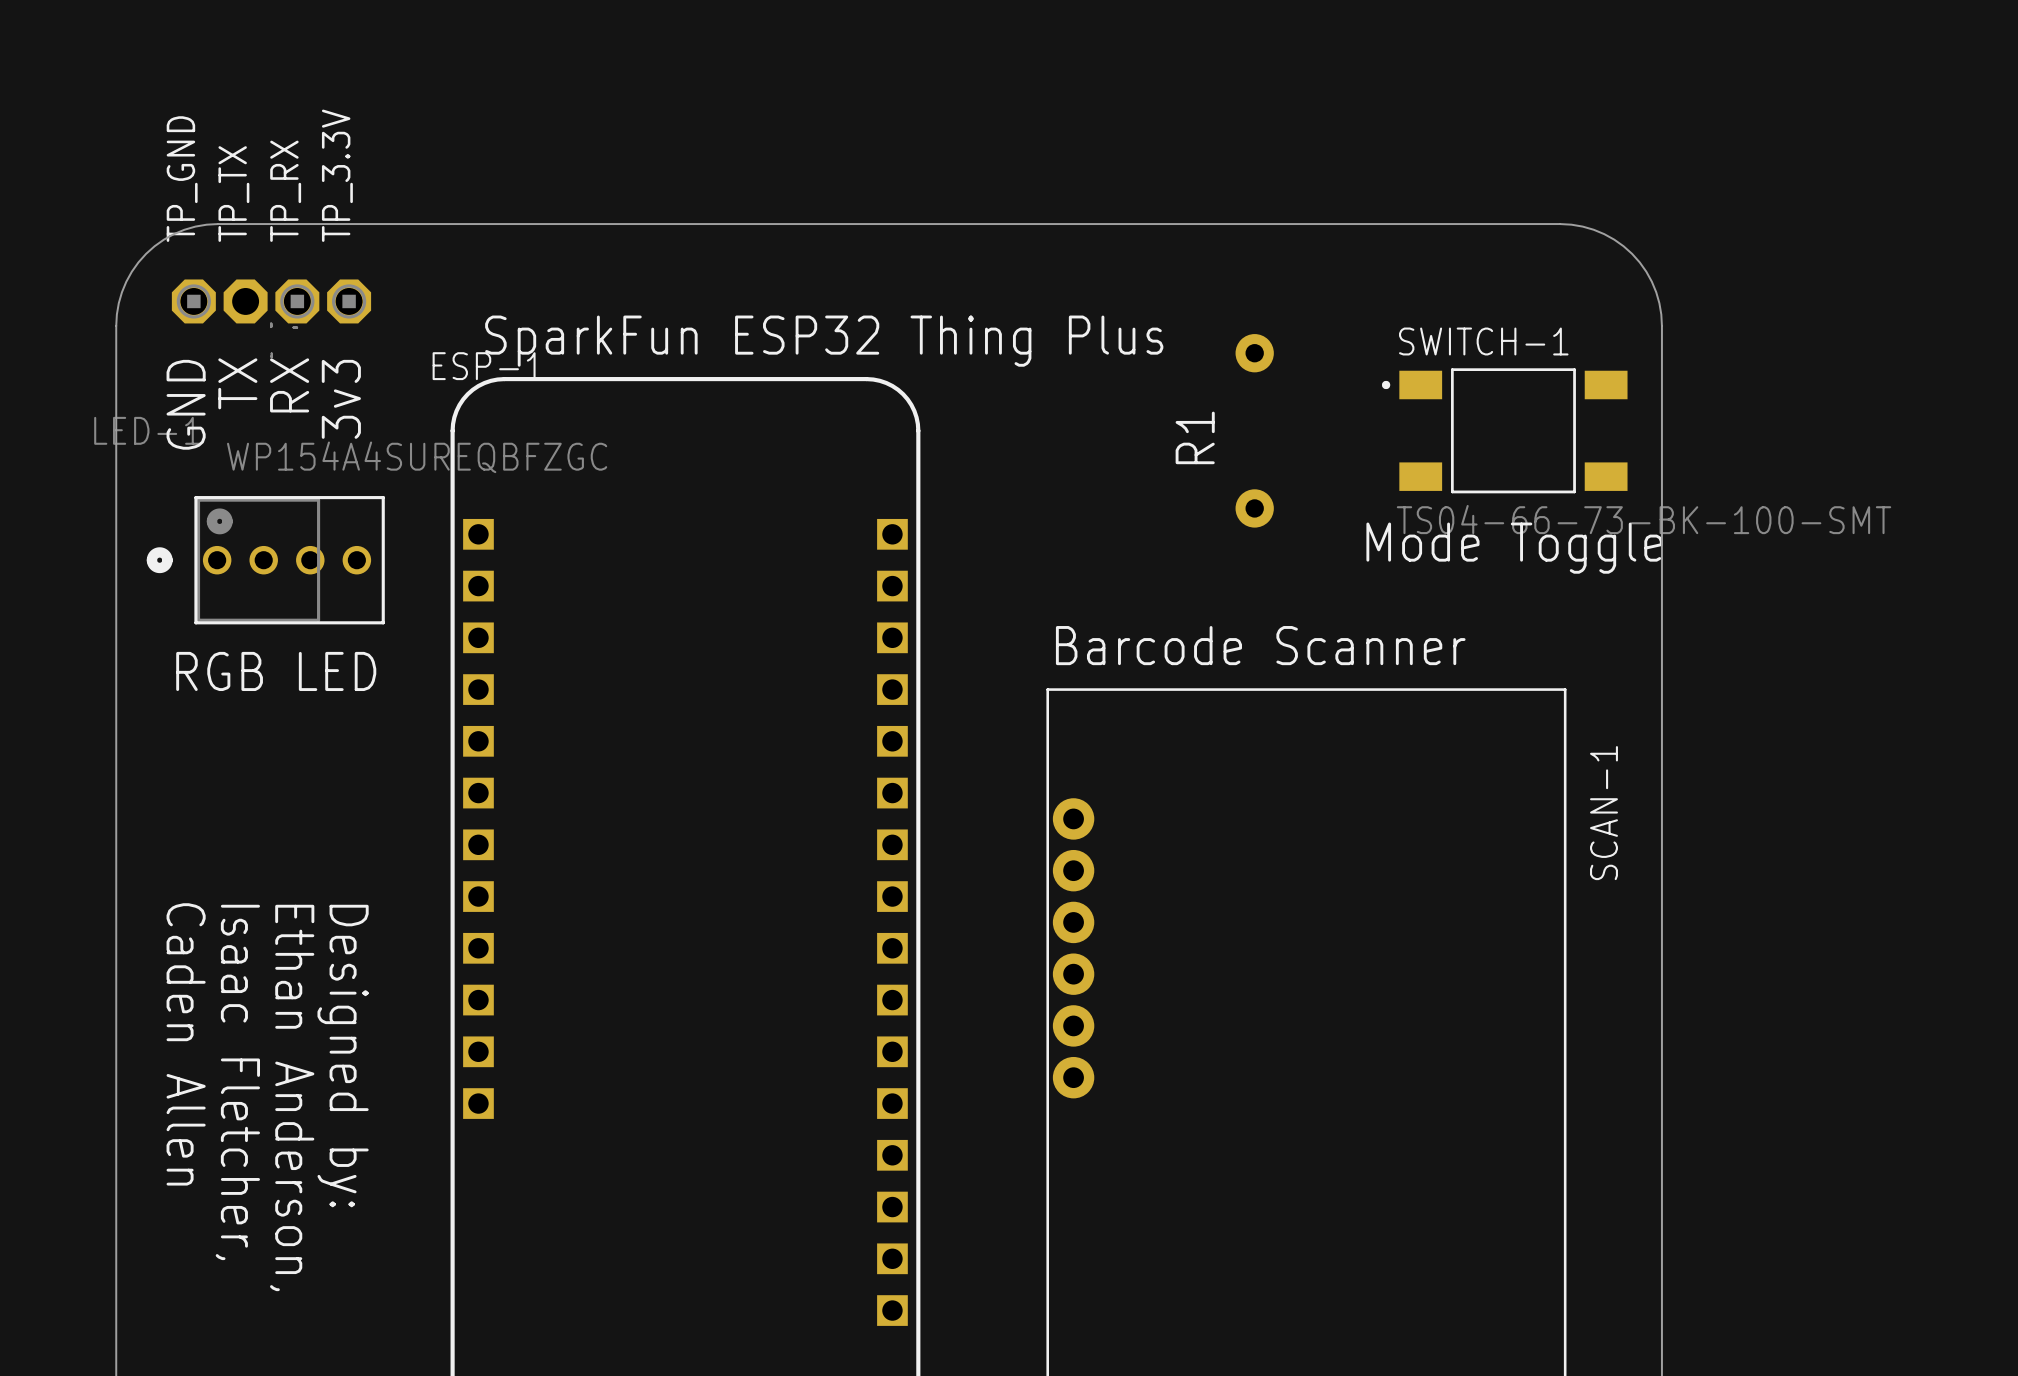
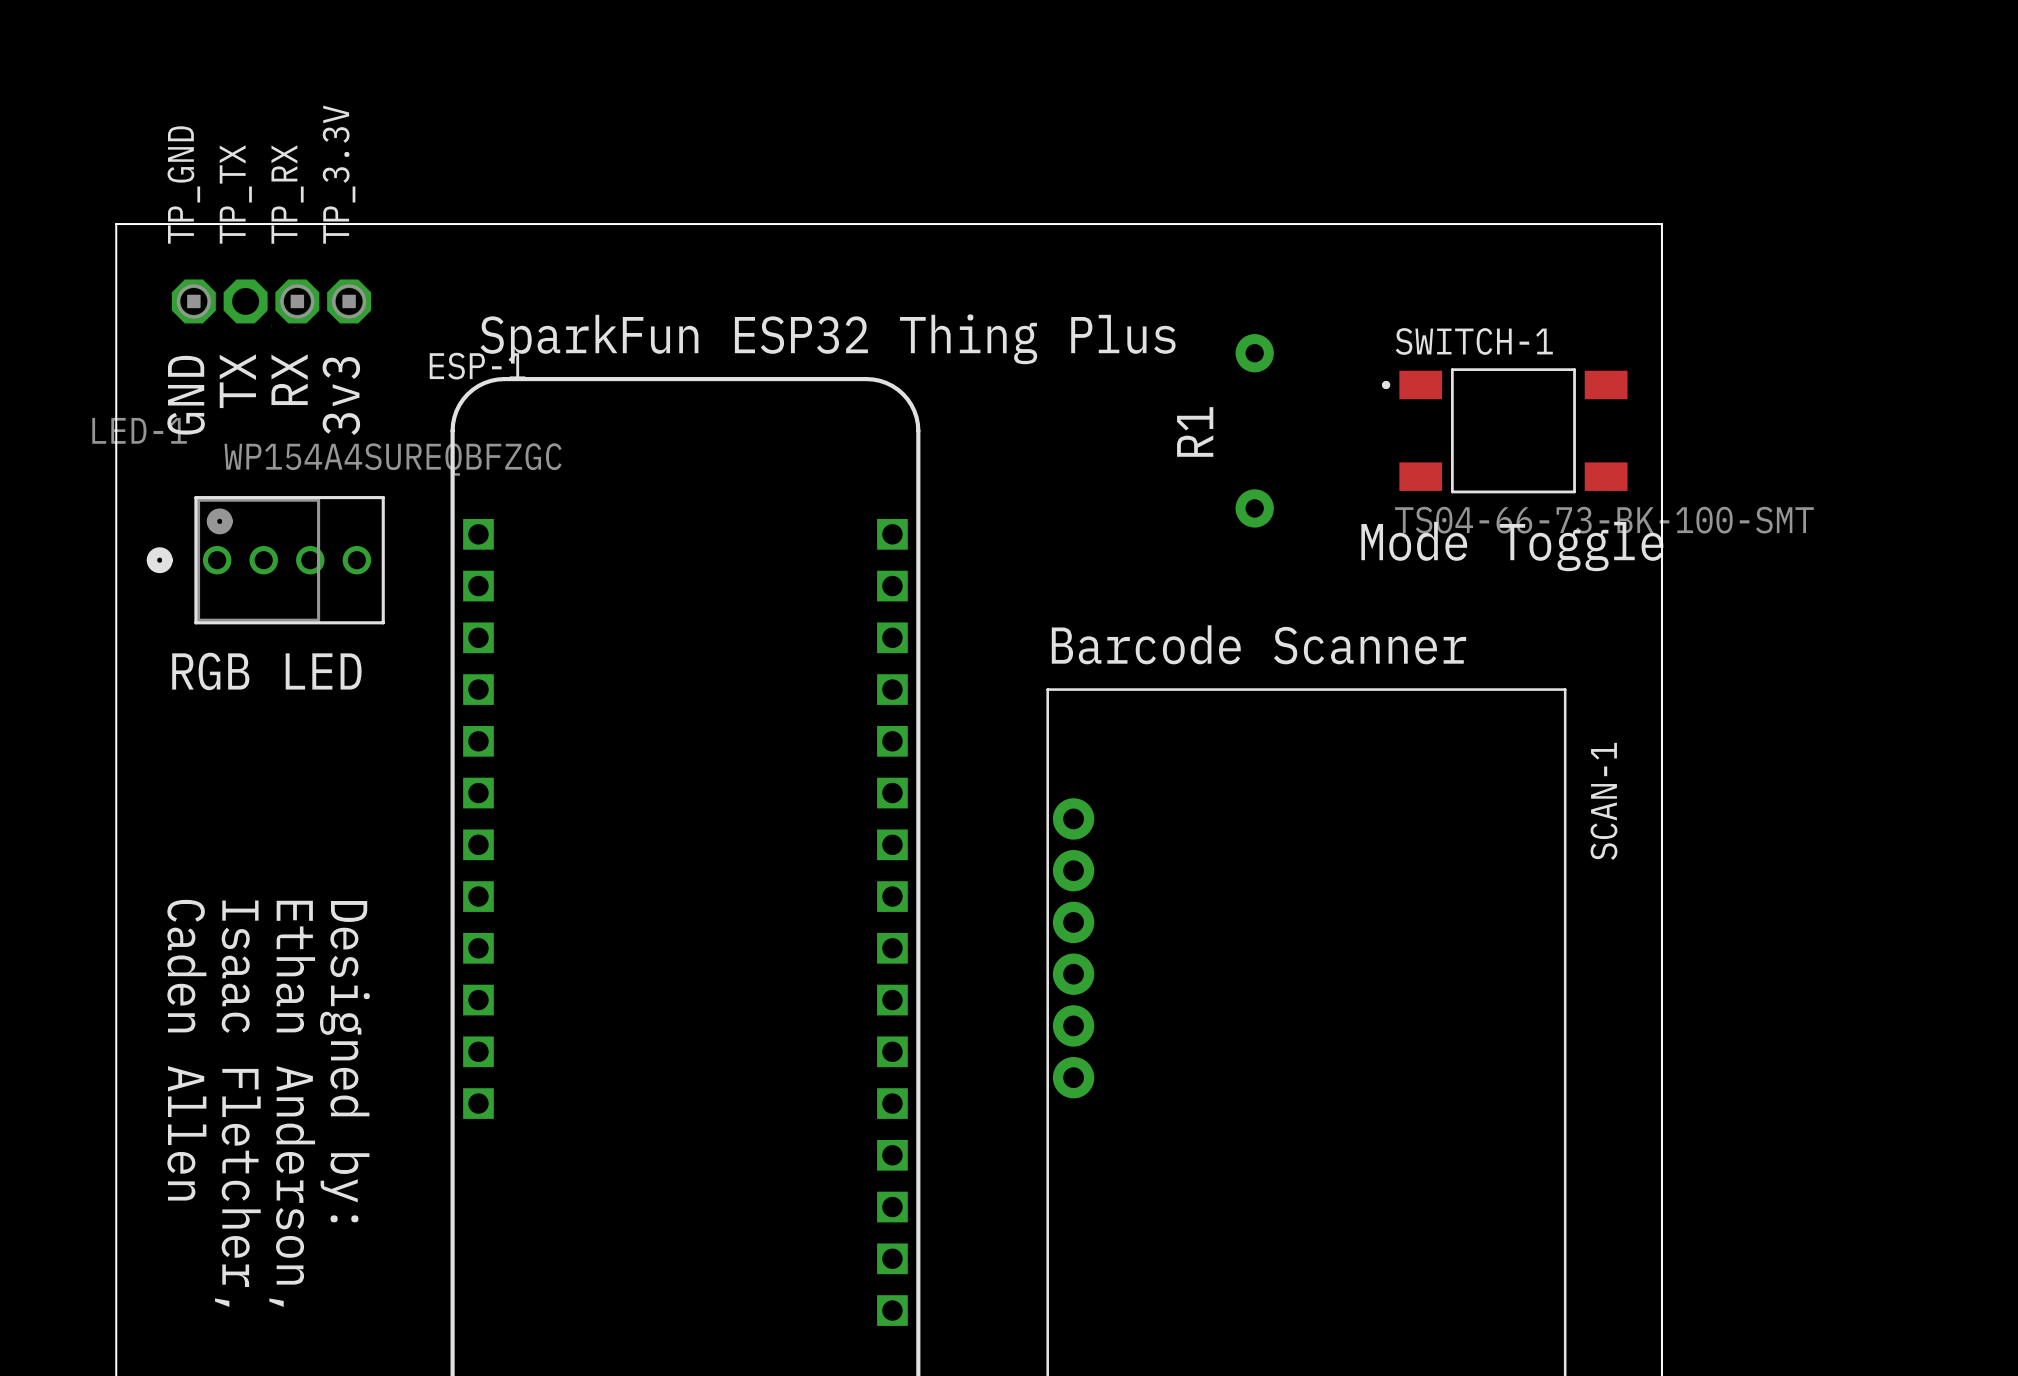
board edge: (218, 224) (184, 229) (163, 239) (146, 253) (131, 271) (121, 292) (116, 325) -> (218, 224) (116, 224) (116, 325)
board edge: (1560, 224) (1593, 229) (1614, 239) (1632, 253) (1646, 271) (1656, 292) (1661, 325) -> (1560, 224) (1661, 224) (1661, 325)

